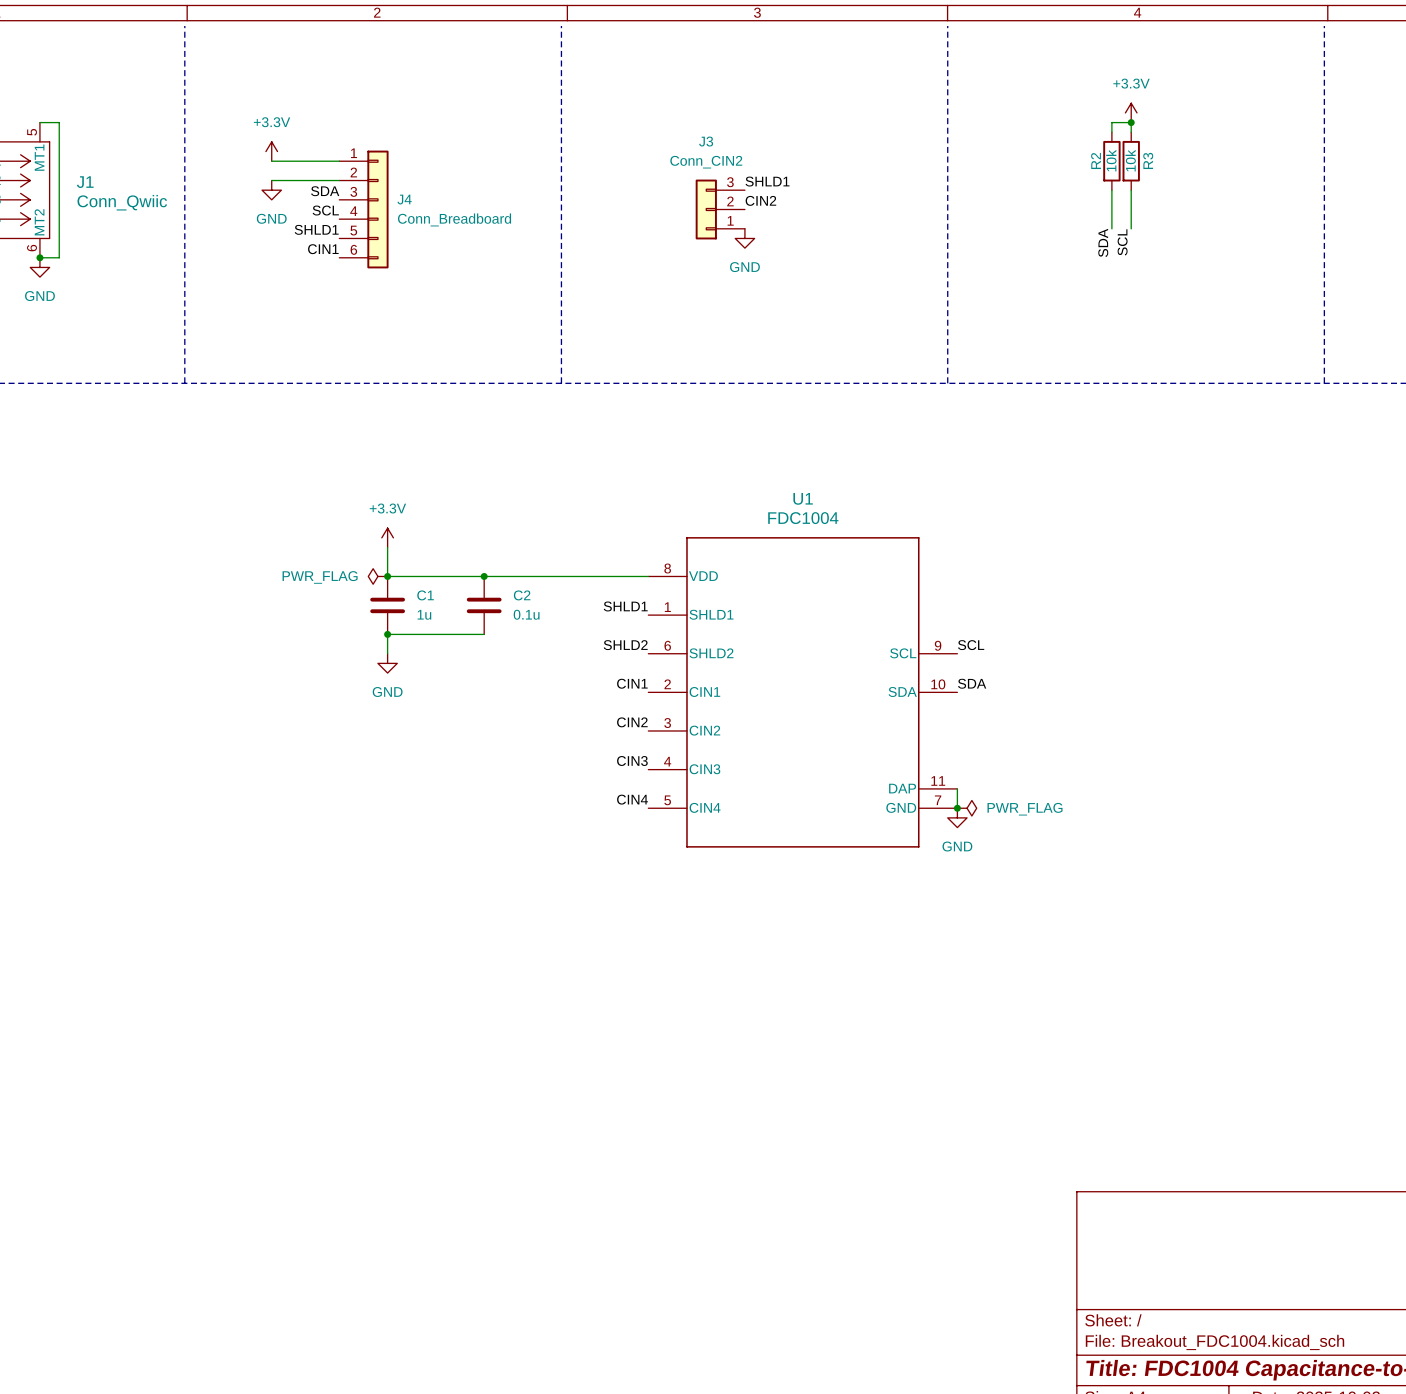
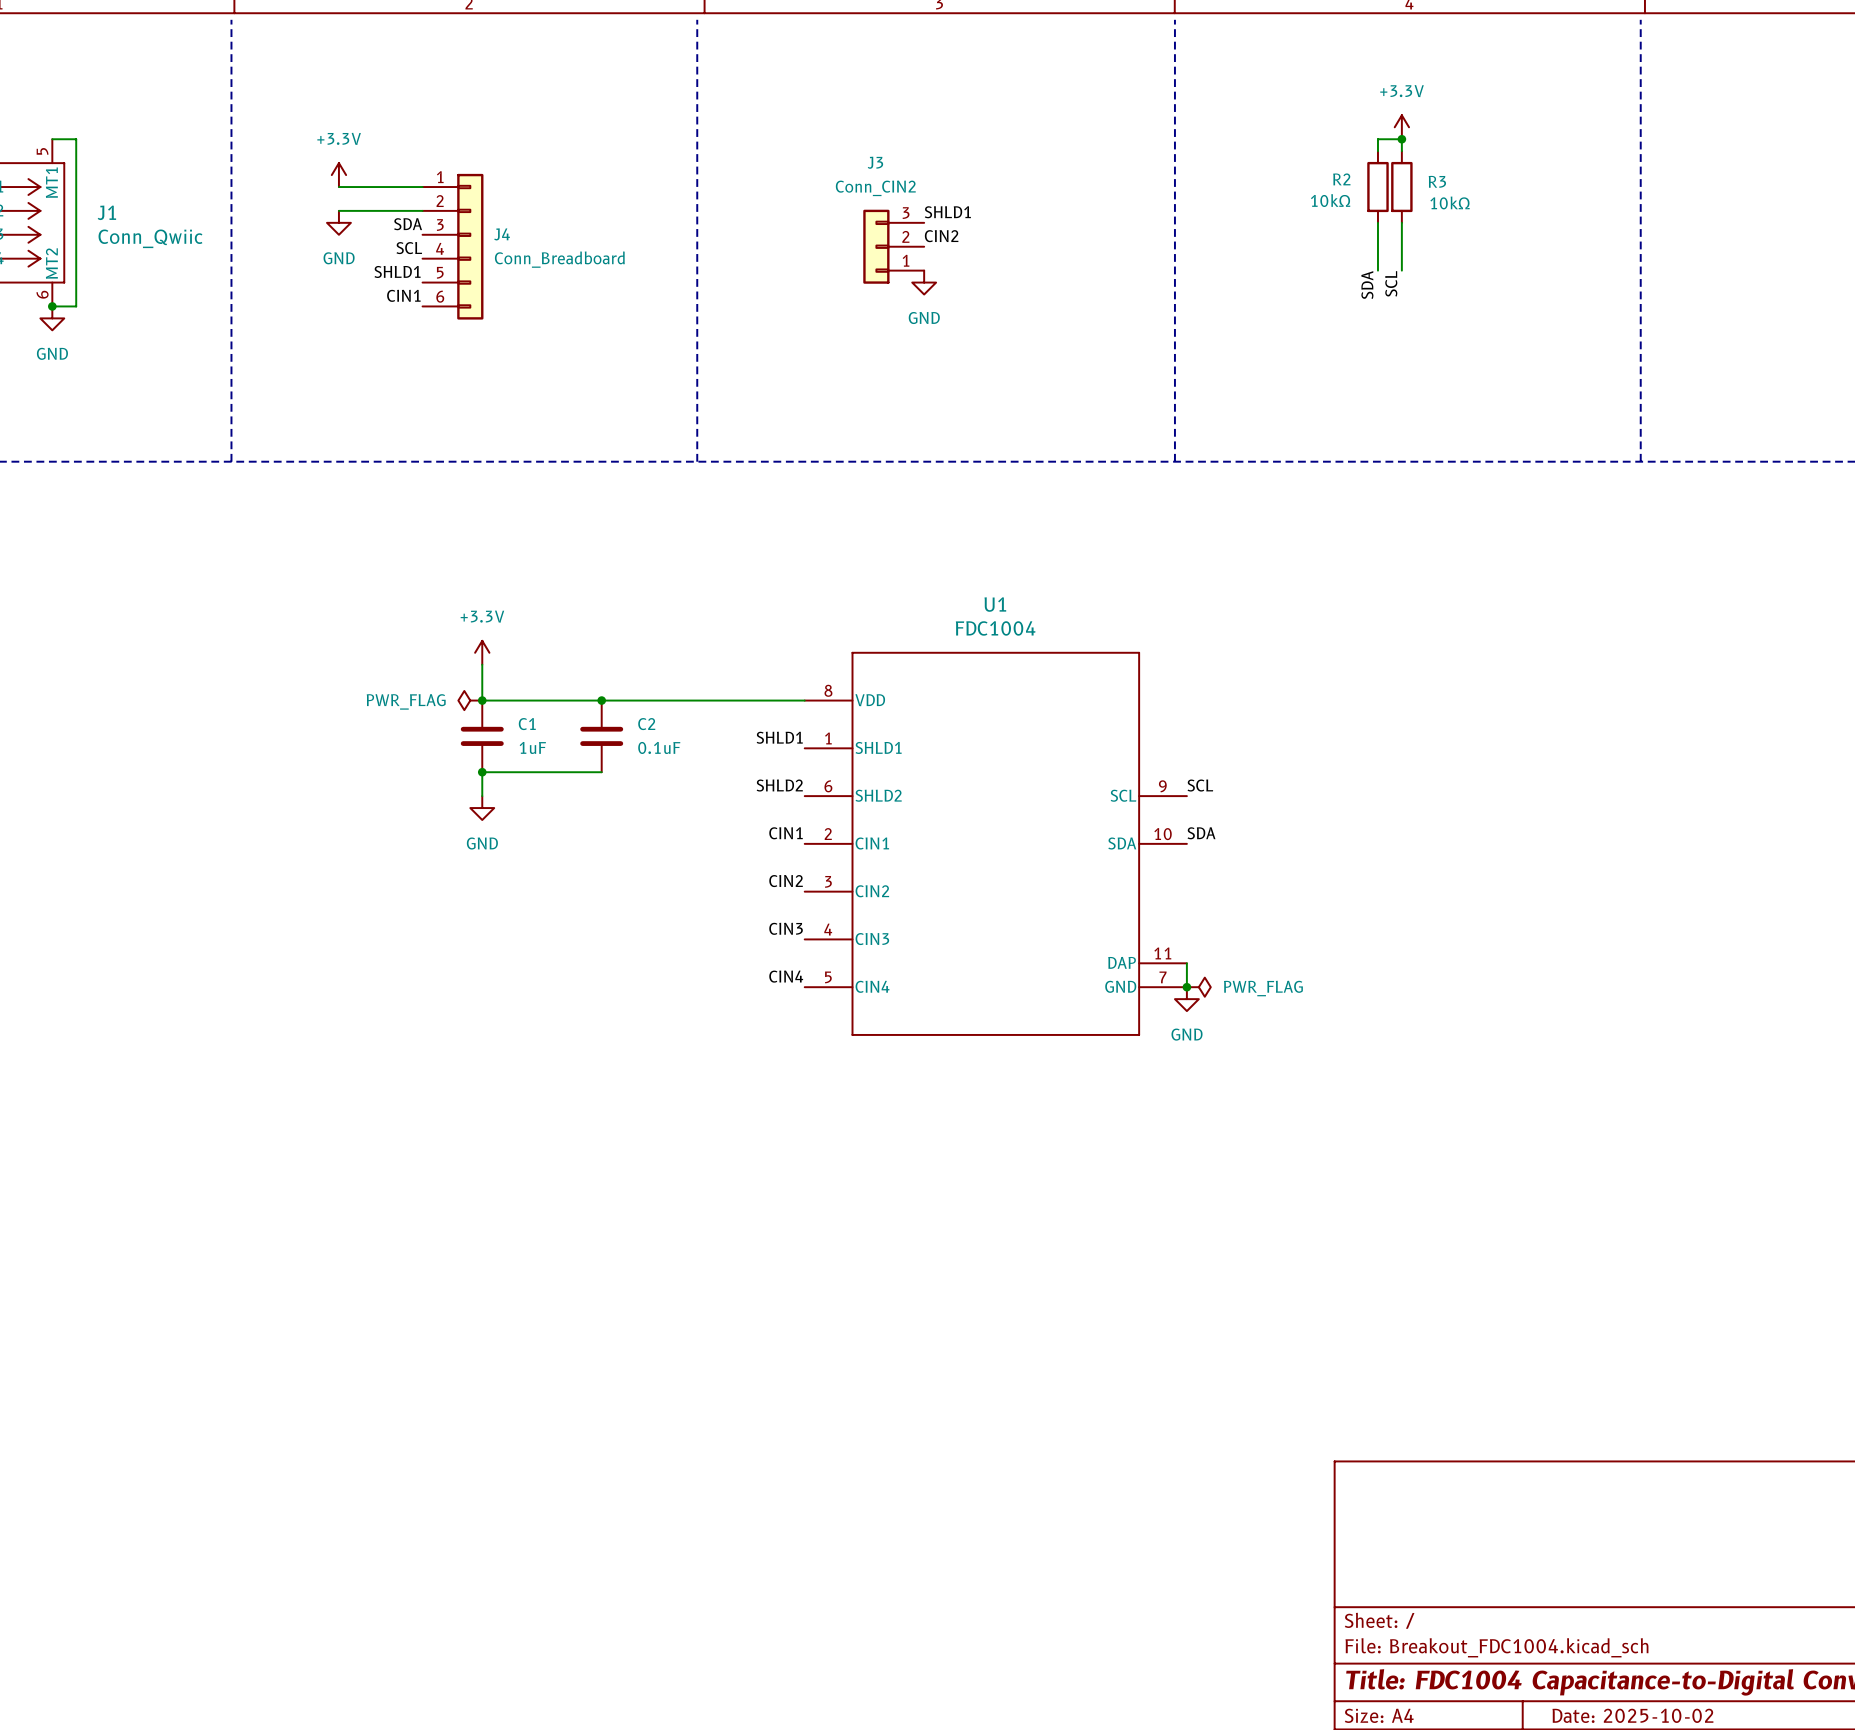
R2 name rotation: 0° (1096, 160) -> 90° clockwise (1341, 179)
R2 value: 10k (1111, 160) -> 10kΩ (1330, 200)
R3 value: 10k (1130, 160) -> 10kΩ (1450, 202)
R3 name rotation: 0° (1148, 160) -> 90° clockwise (1437, 181)
C1 value: 1u (424, 614) -> 1uF (532, 747)
C2 value: 0.1u (526, 614) -> 0.1uF (659, 747)

